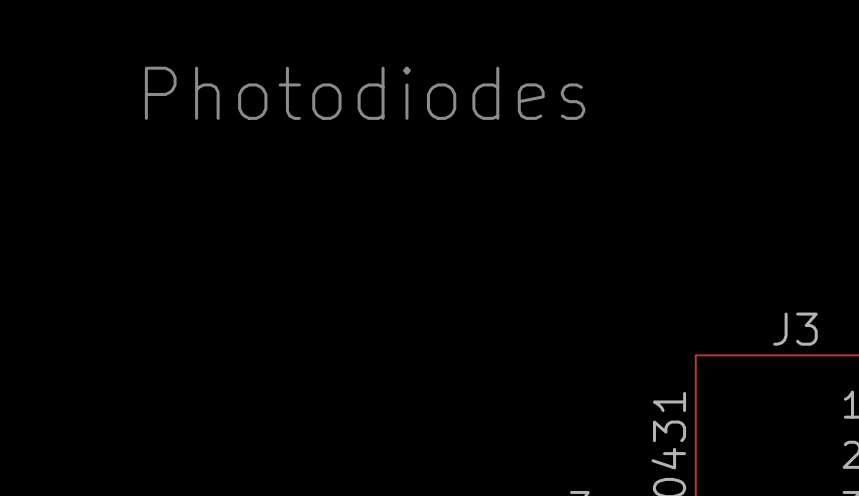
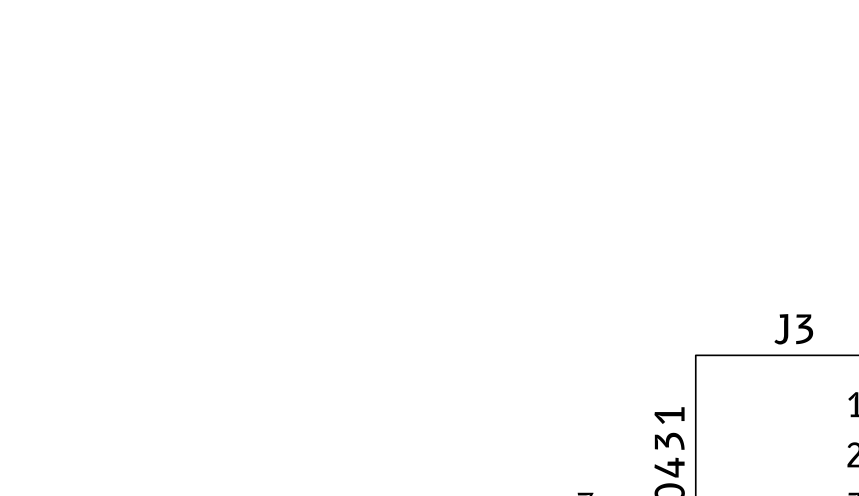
text: Photodiodes (365, 93) -> none

